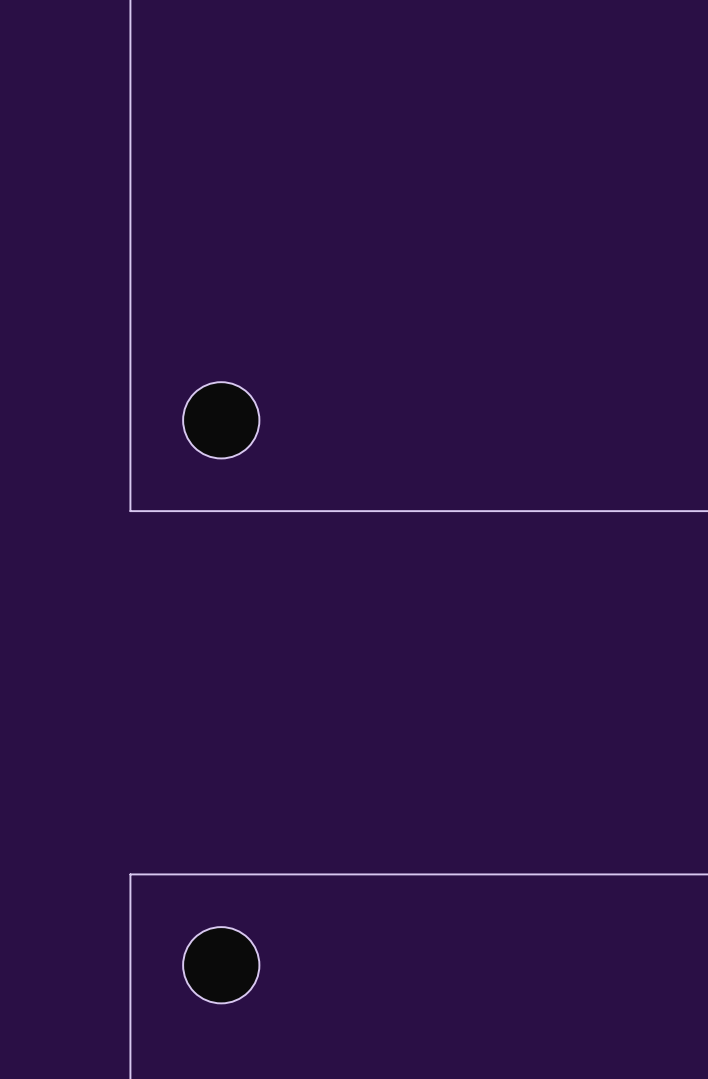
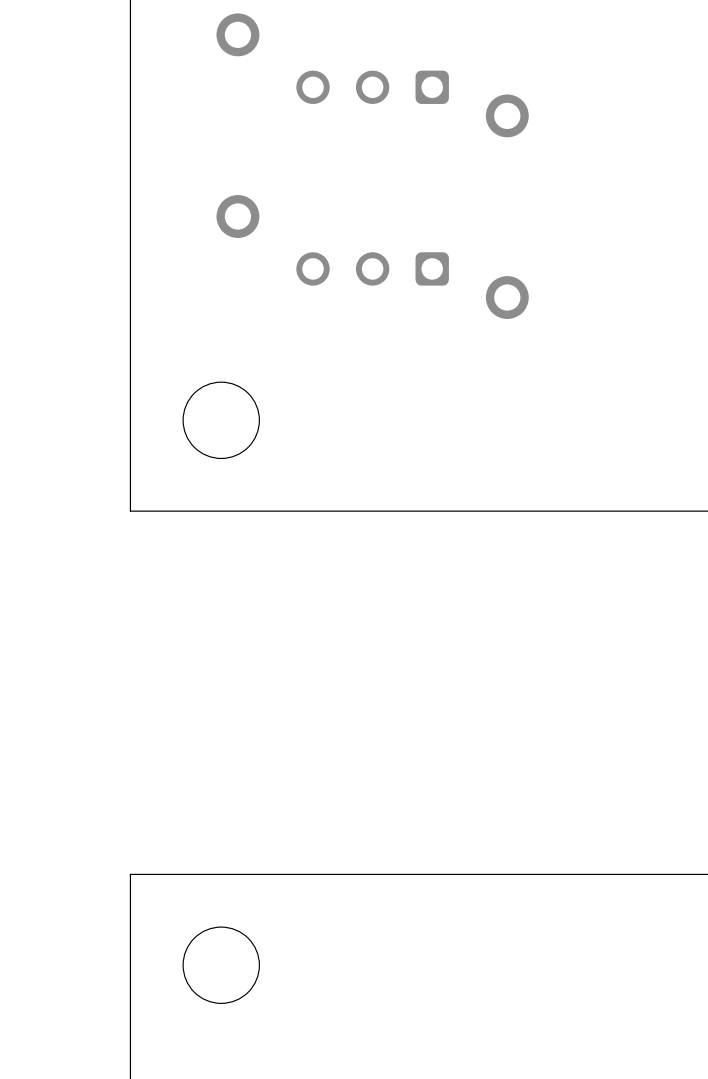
part: none -> (372, 75)
part: none -> (372, 257)

